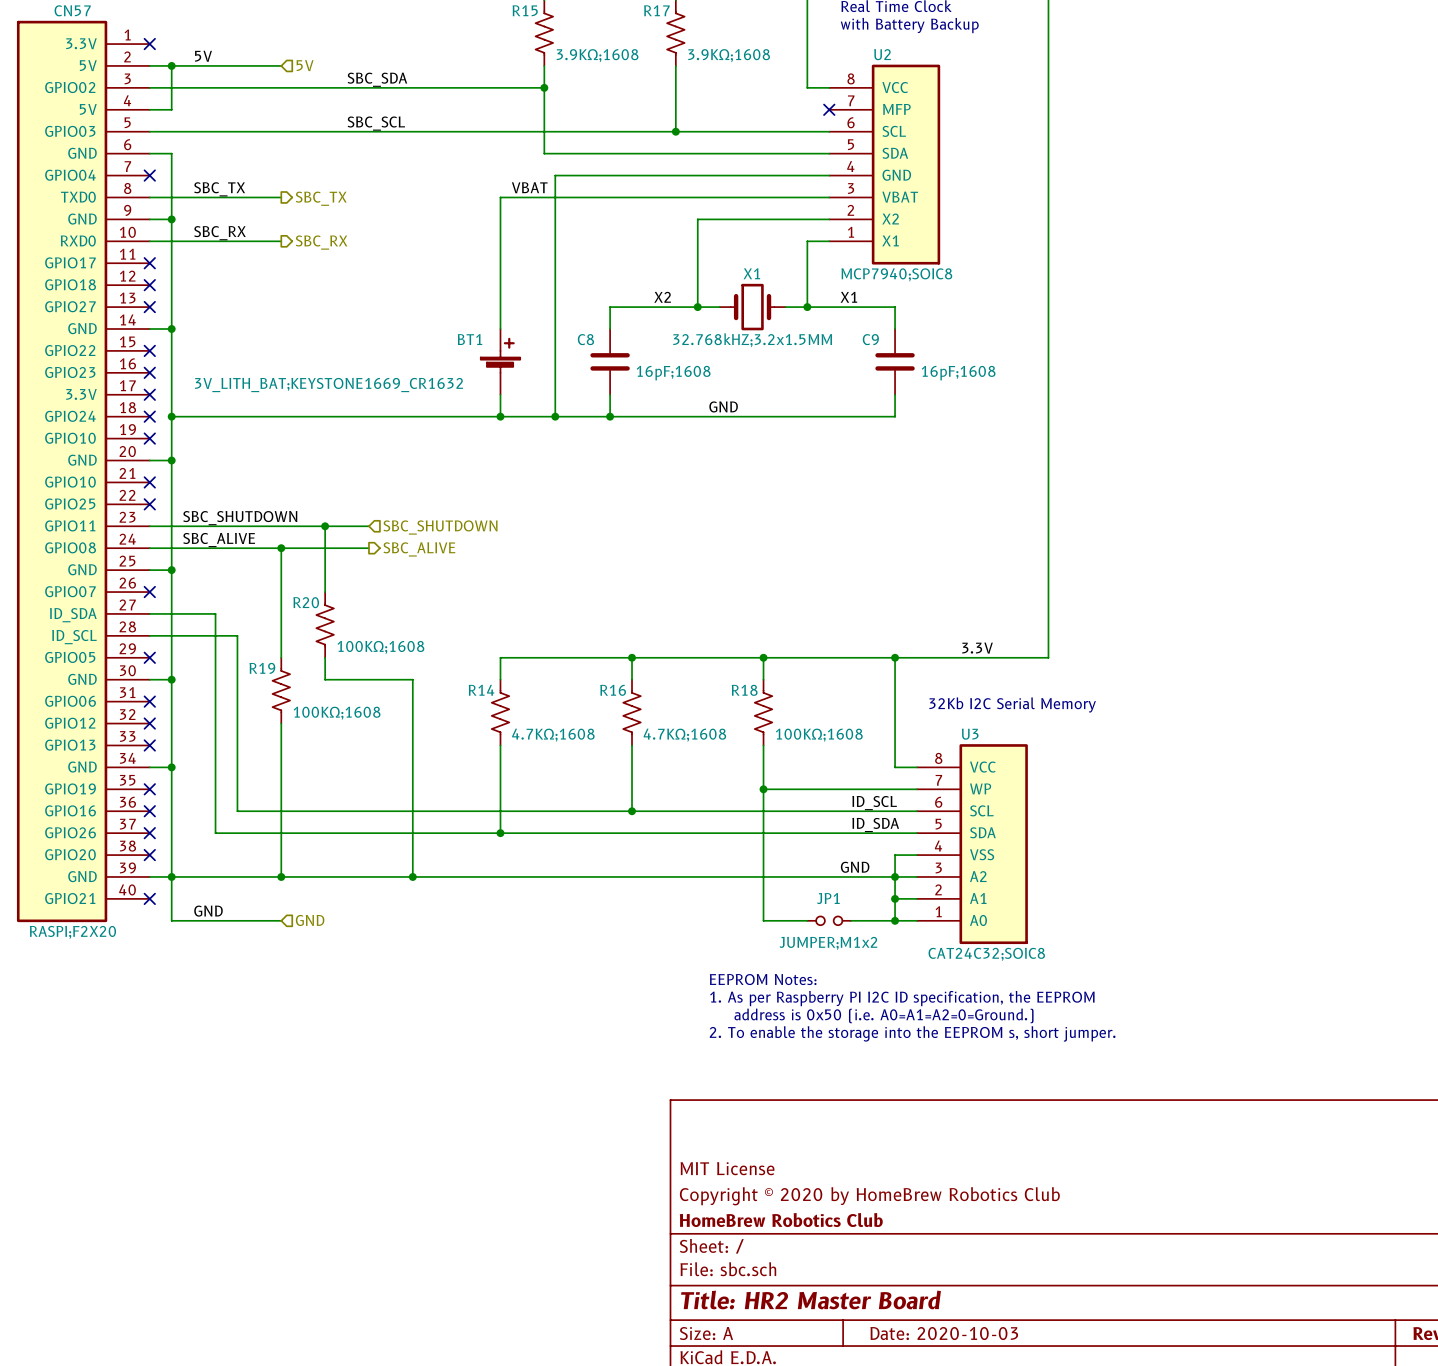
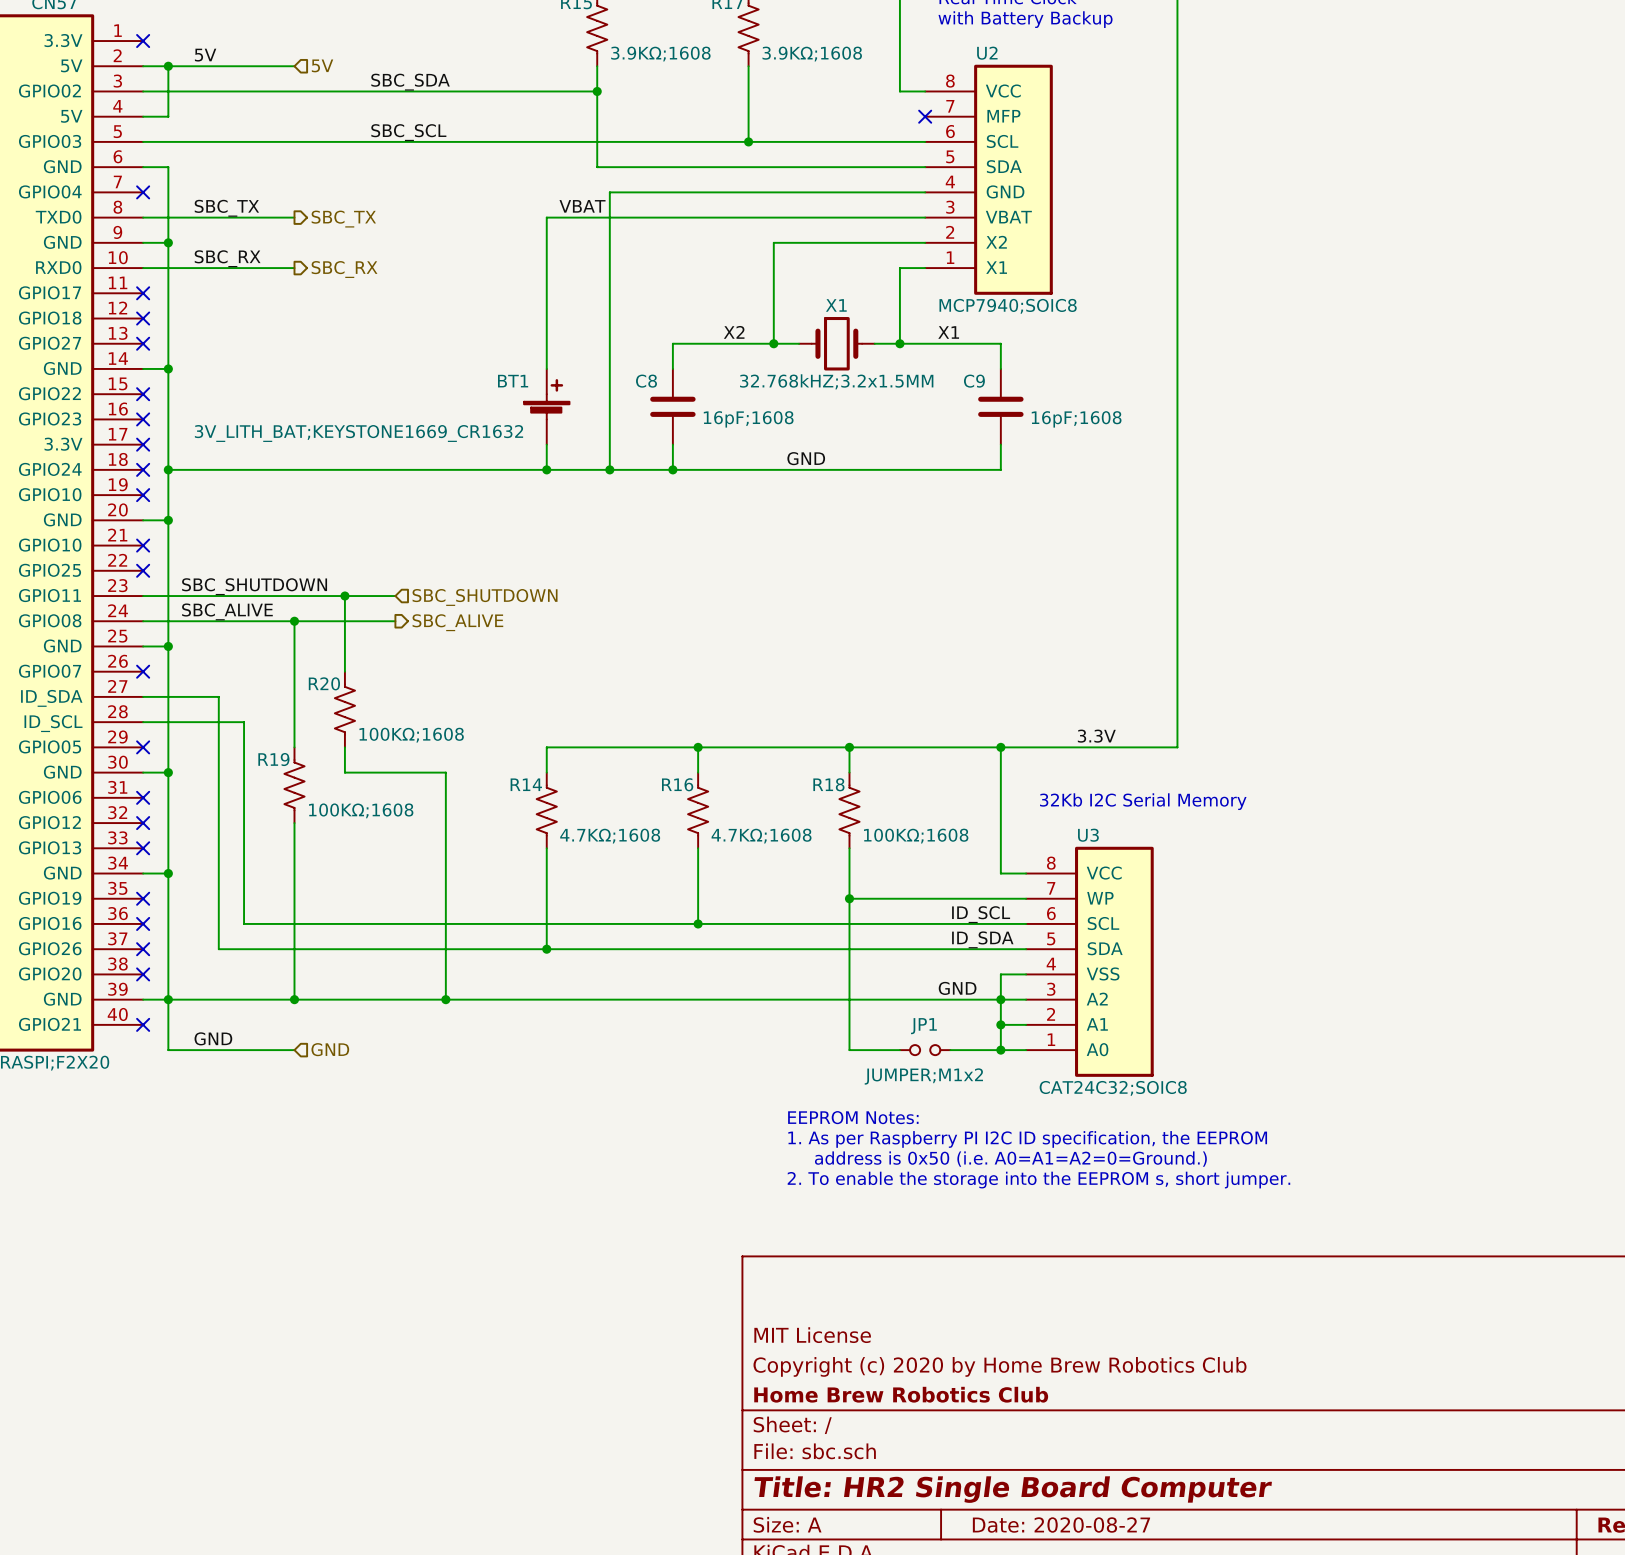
title block: Copyright © 2020 by HomeBrew Robotics Club (869, 1196) -> Copyright (c) 2020 by Home Brew Robotics Club (999, 1366)
title block: HomeBrew Robotics Club (781, 1220) -> Home Brew Robotics Club (901, 1394)
title block: Title: HR2 Master Board (811, 1299) -> Title: HR2 Single Board Computer (1013, 1489)
title block: Date: 2020-10-03 (944, 1333) -> Date: 2020-08-27 (1061, 1525)

